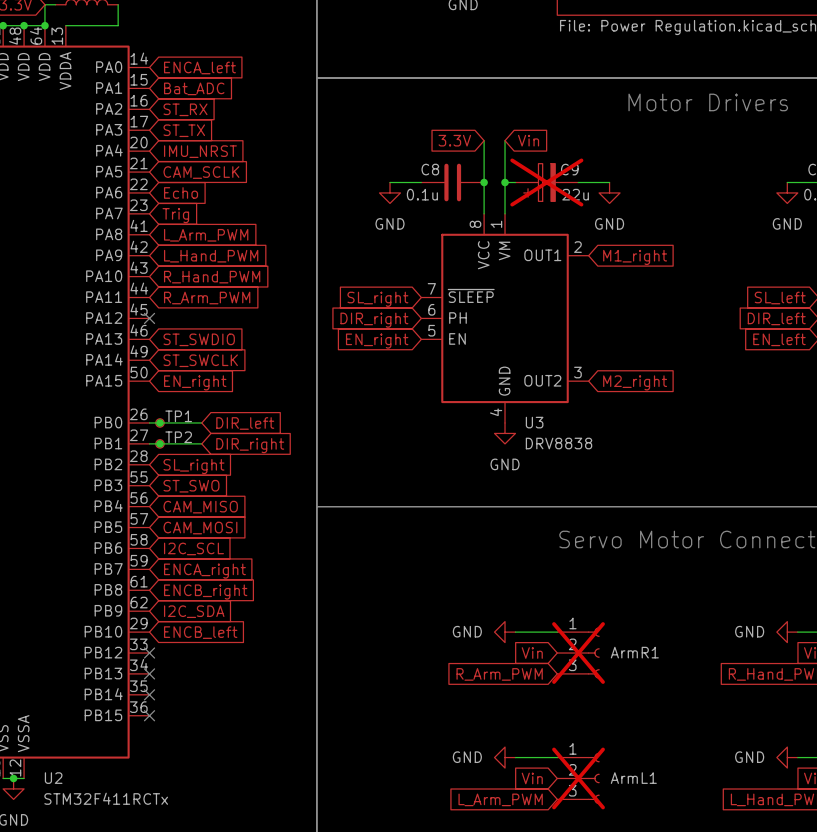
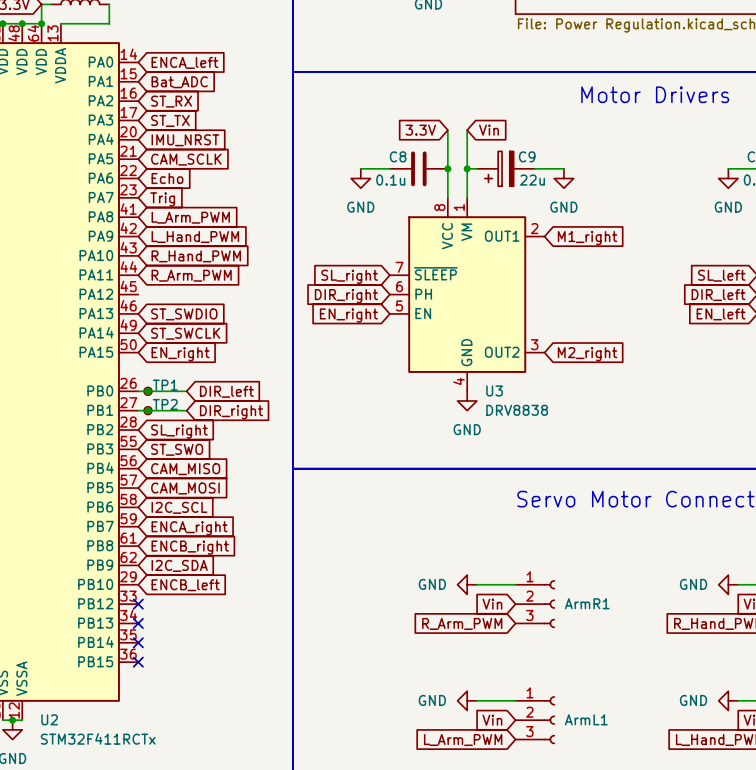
C9 do-not-place cross: (546, 182) -> none
no-connect mark: (149, 318) -> none
ArmR1 do-not-place cross: (578, 653) -> none
ArmL1 do-not-place cross: (578, 778) -> none

